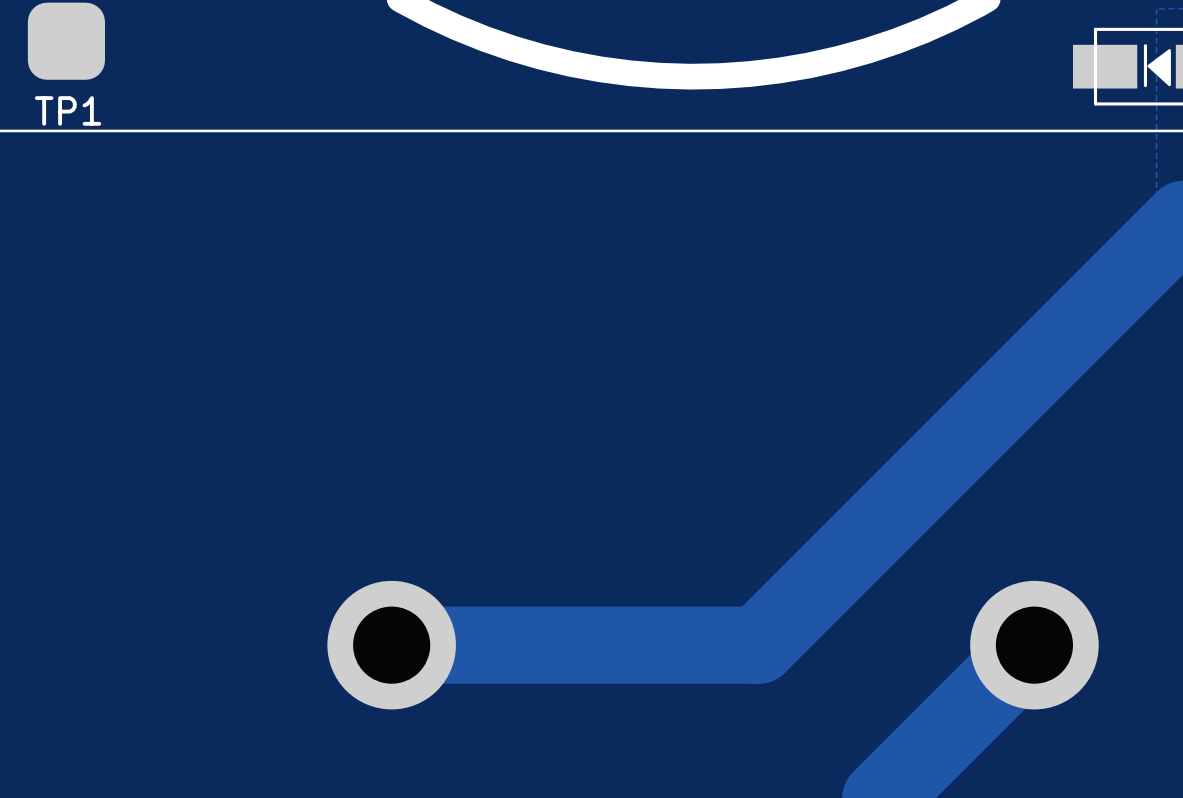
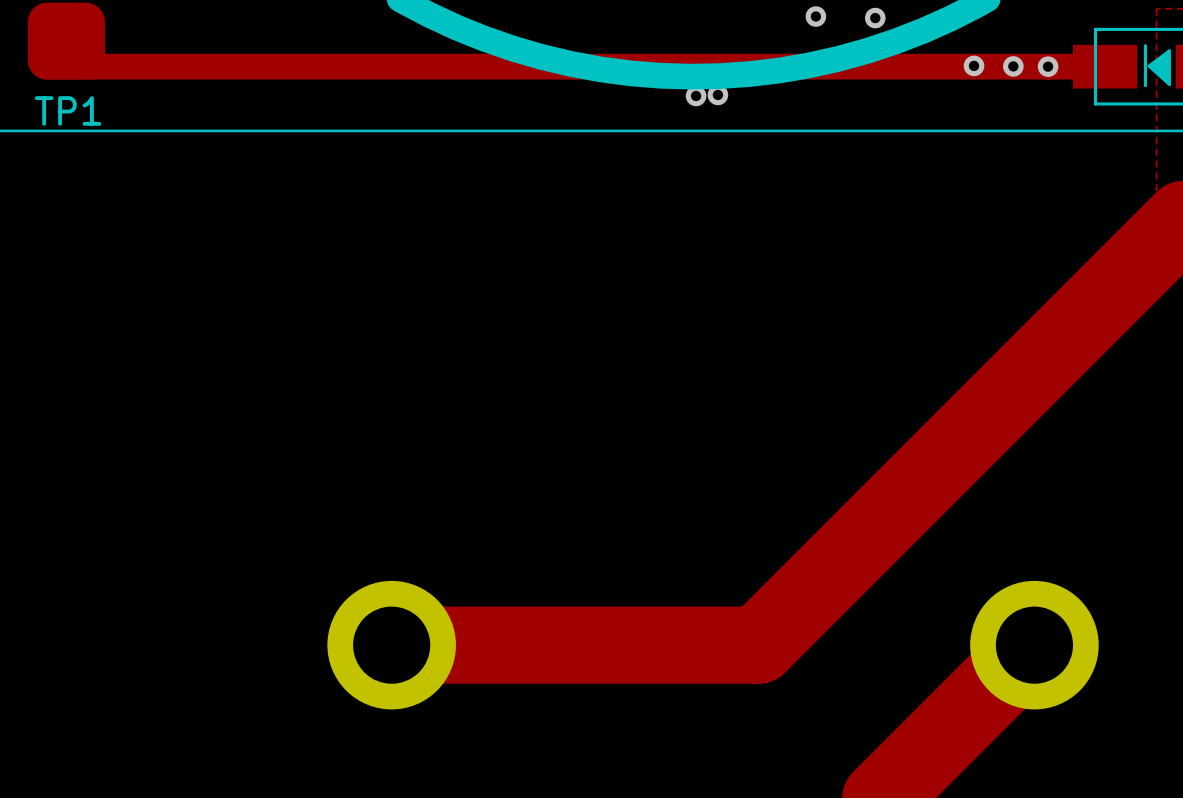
via: none -> (815, 16)
via: none -> (875, 18)
track: none -> (66, 41) (91, 66) (1105, 66)
via: none -> (974, 65)
via: none -> (1013, 66)
via: none -> (1048, 66)
via: none -> (717, 94)
via: none -> (696, 95)

